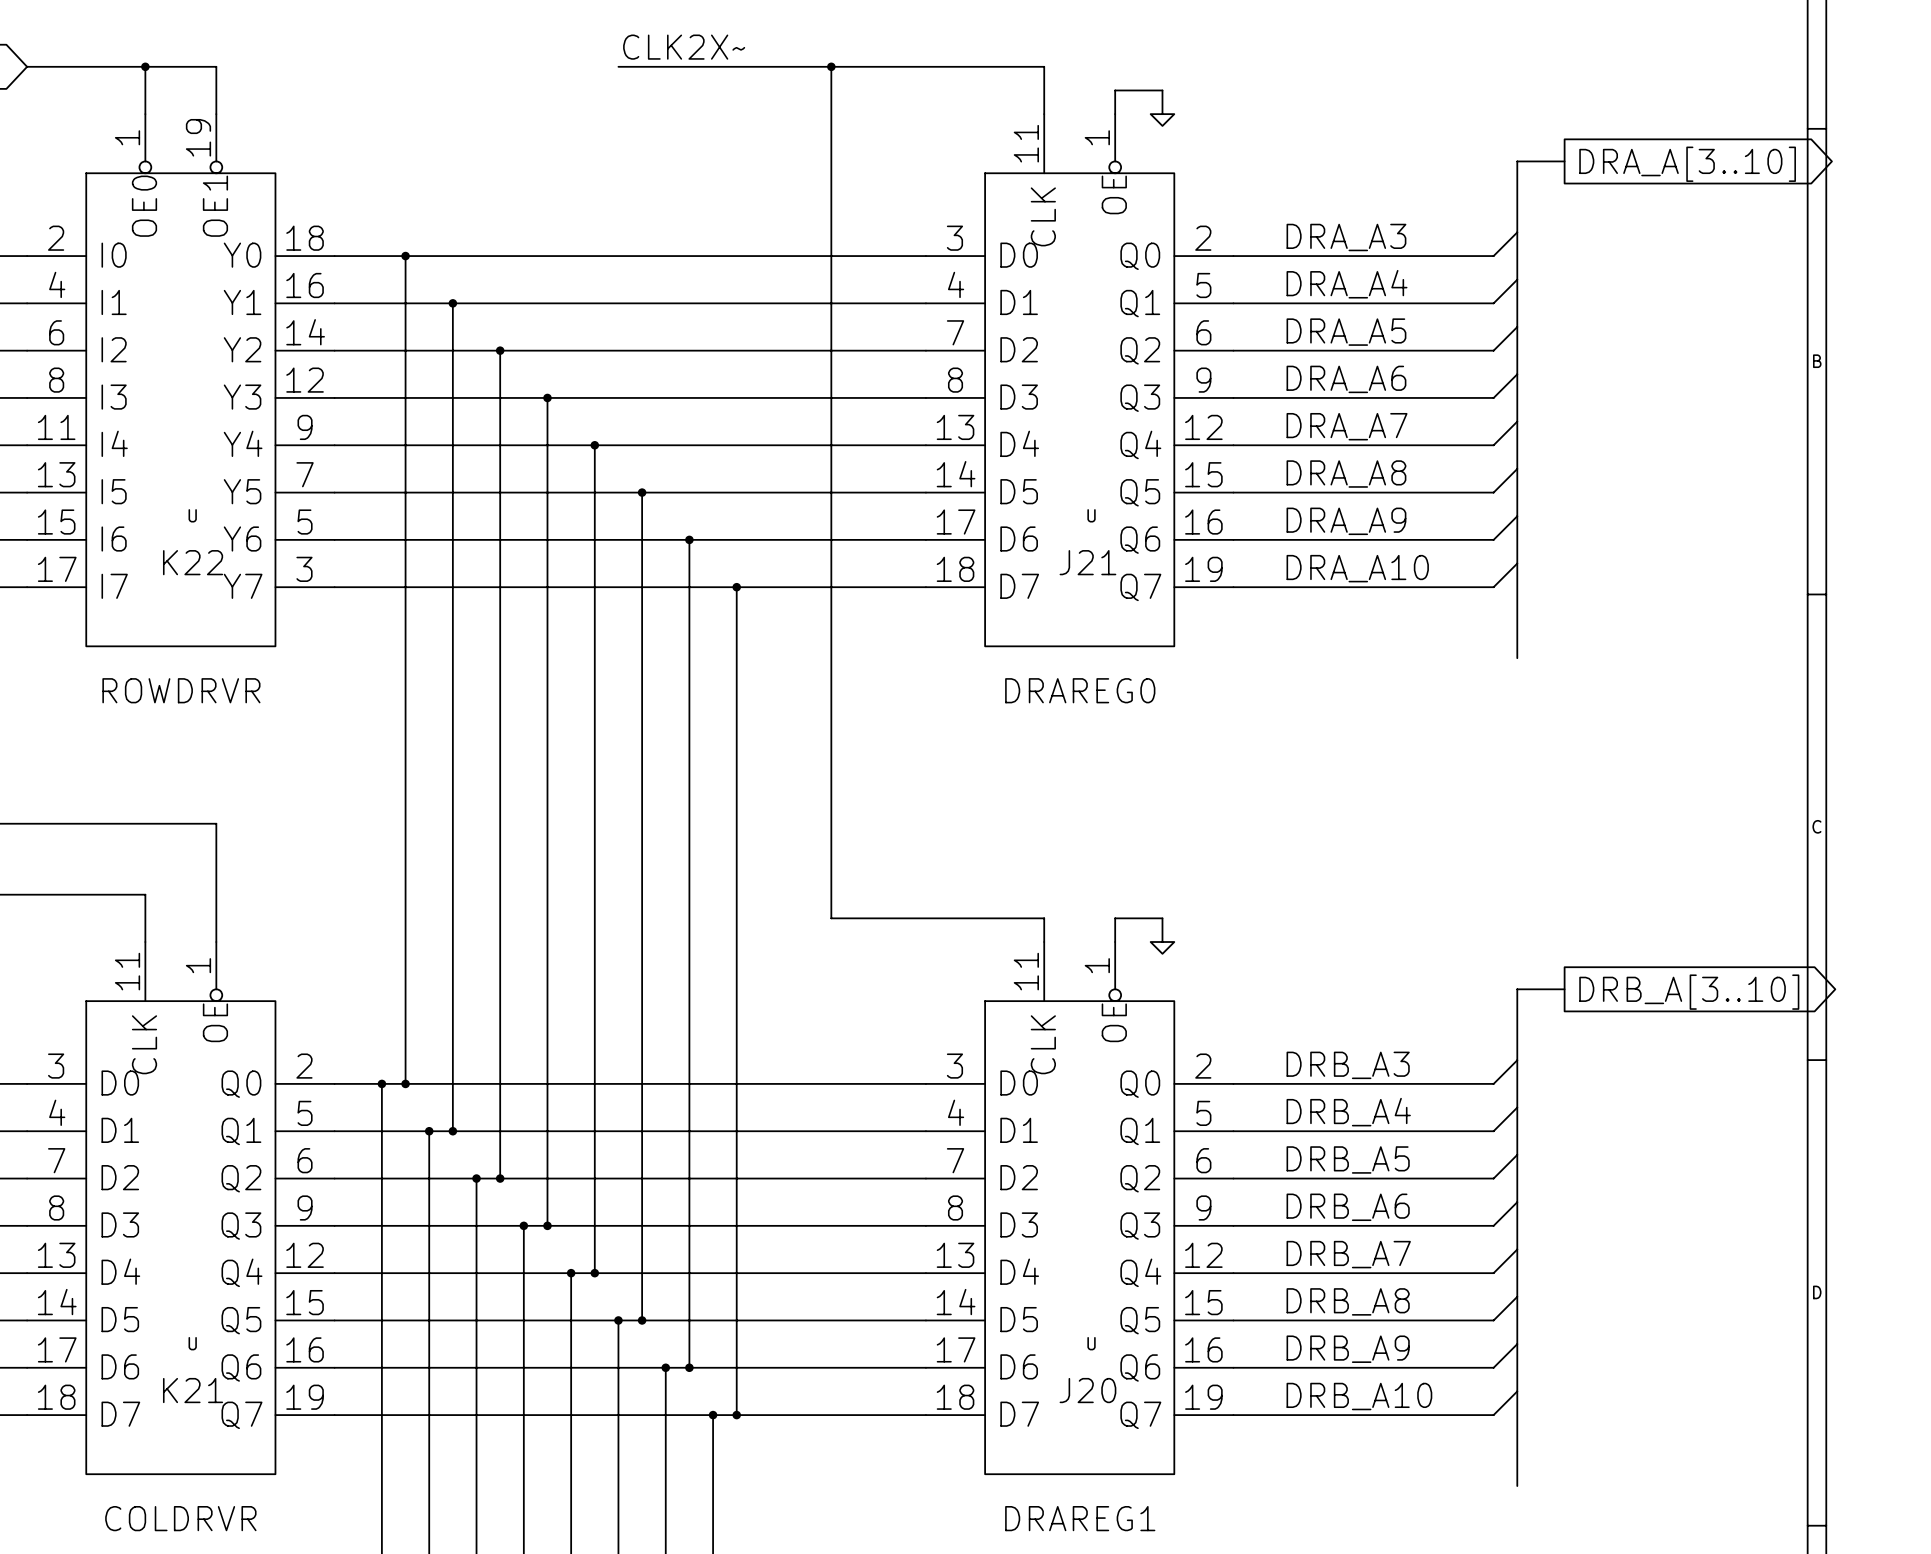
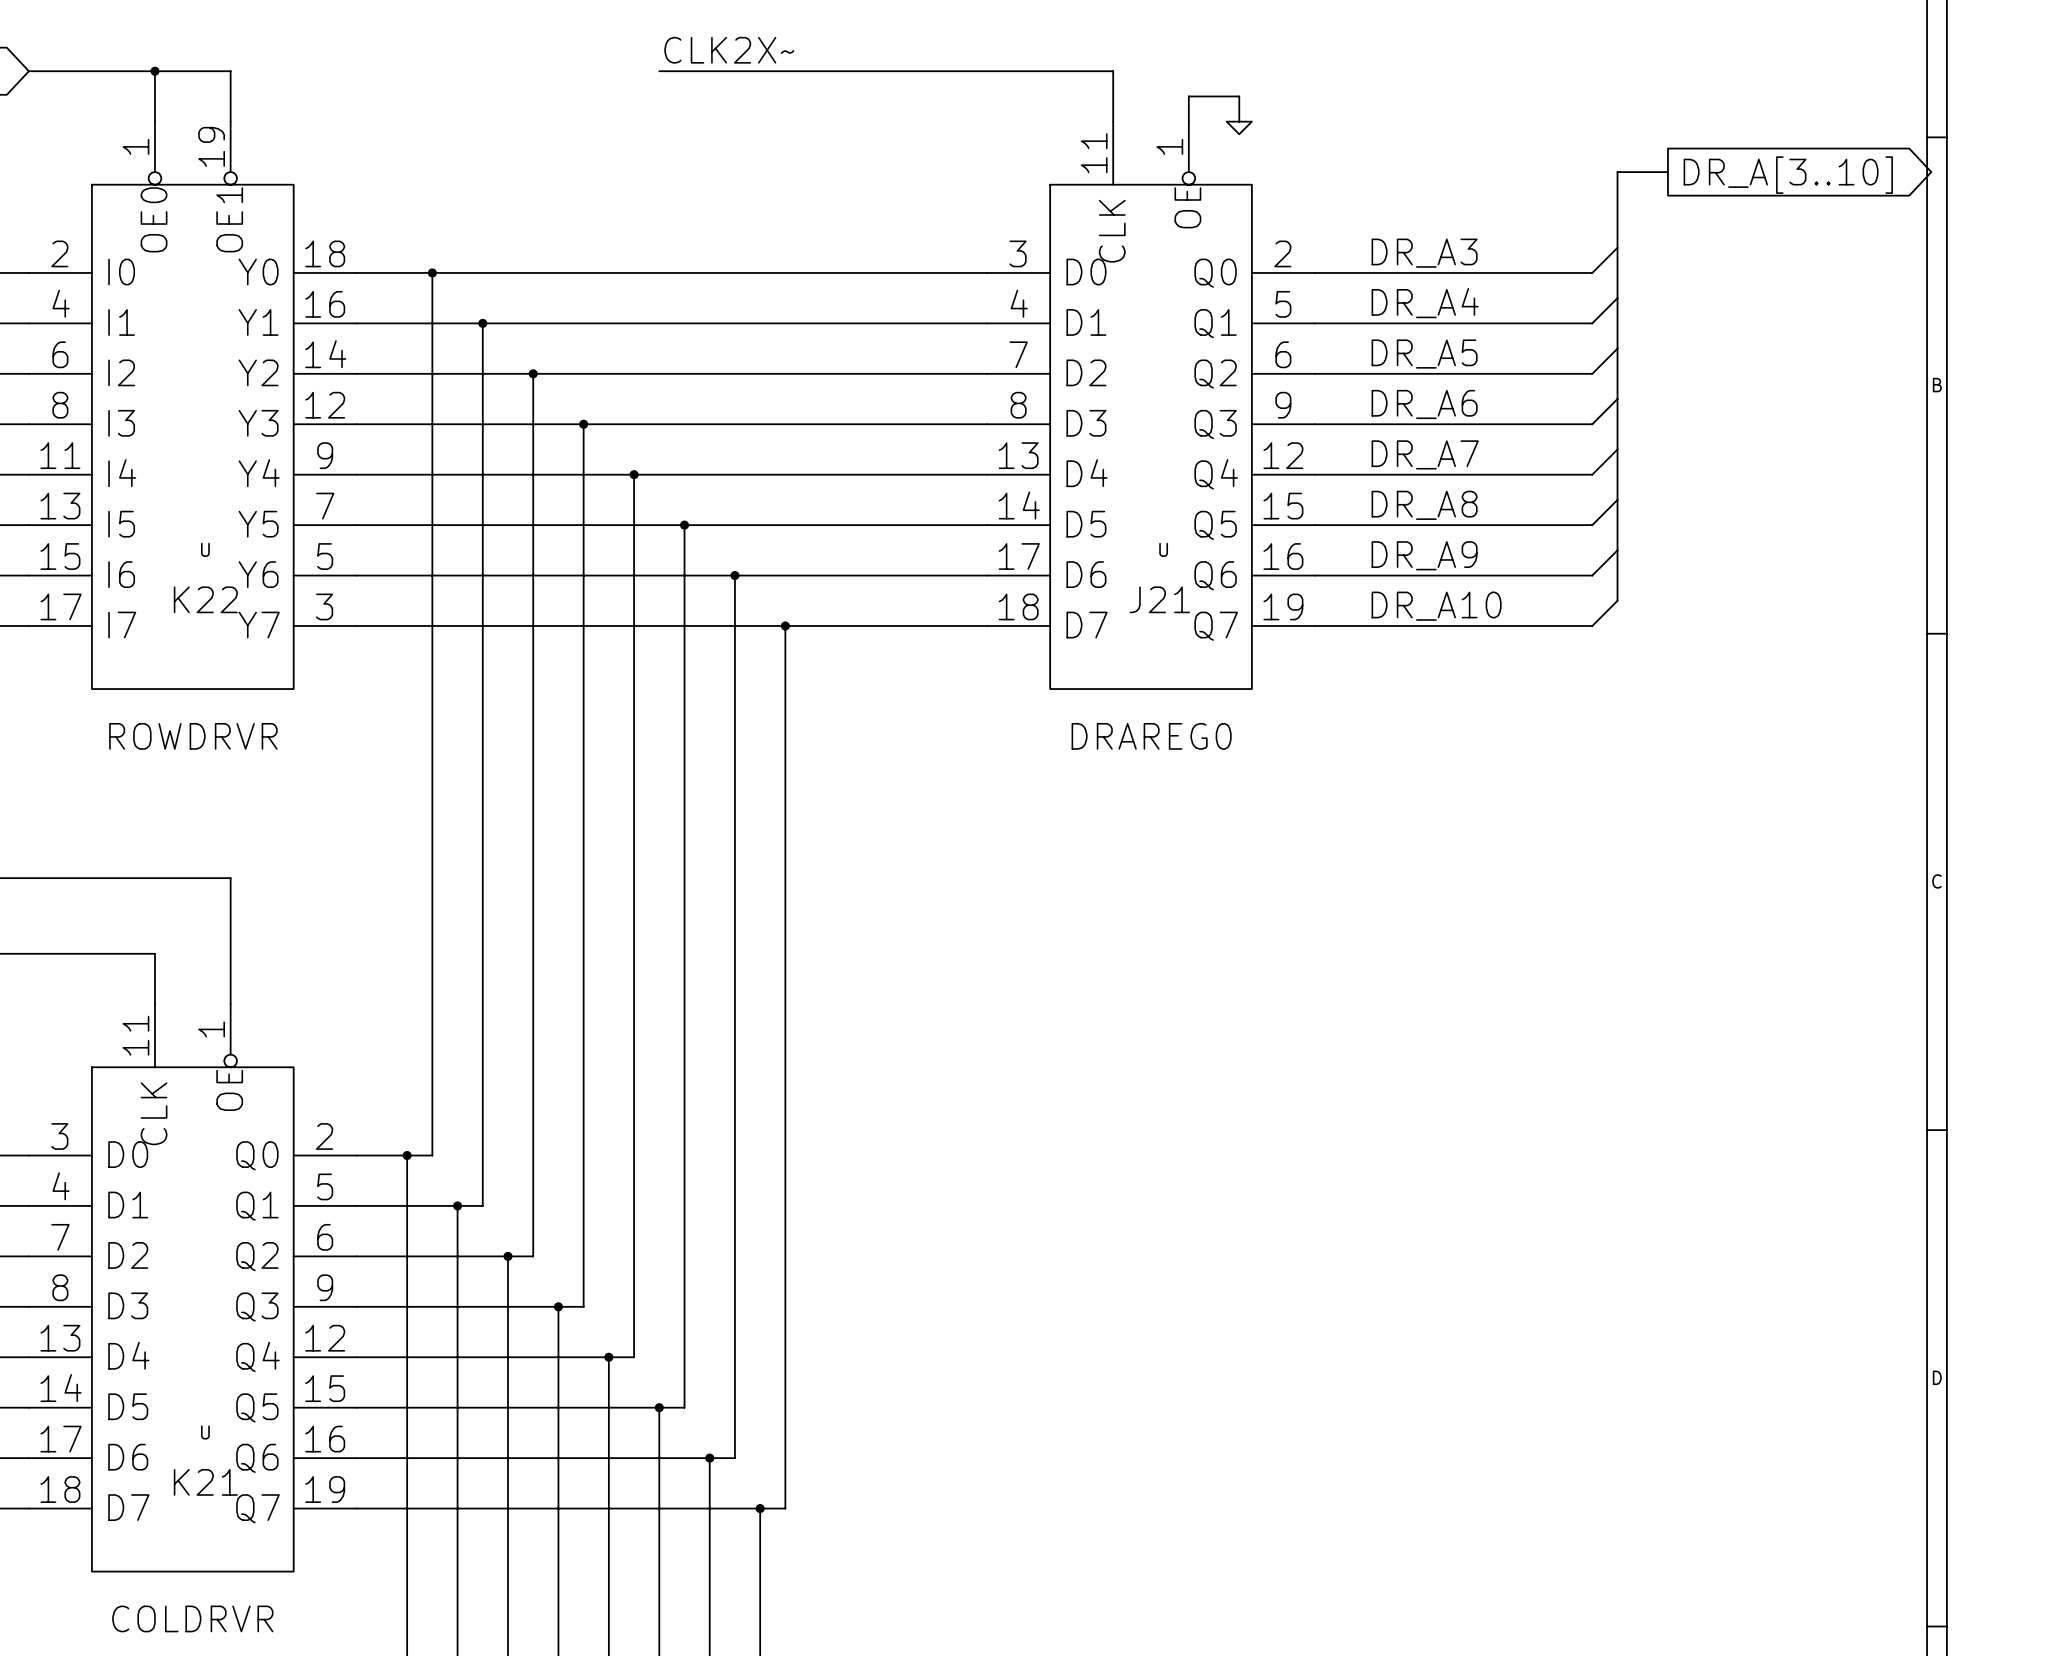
wire: (831, 66) (831, 918) (1044, 918) (1044, 942) -> none
junction: (831, 66) -> none
global label: DRA_A[3..10] (1687, 164) -> DR_A[3..10] (1788, 175)
label: DRA_A3 (1346, 237) -> DR_A3 (1424, 253)
label: DRA_A4 (1347, 284) -> DR_A4 (1425, 303)
label: DRA_A5 (1346, 332) -> DR_A5 (1424, 354)
label: DRA_A6 (1346, 379) -> DR_A6 (1424, 404)
label: DRA_A7 (1347, 426) -> DR_A7 (1425, 454)
label: DRA_A8 (1346, 474) -> DR_A8 (1424, 505)
label: DRA_A9 (1346, 521) -> DR_A9 (1424, 555)
bus: (1517, 563) (1517, 658) -> none
label: DRA_A10 (1357, 568) -> DR_A10 (1436, 606)
wire: (1162, 918) (1115, 918) (1115, 942) -> none
power symbol: (1162, 936) -> none
bus: (1564, 989) (1517, 989) (1517, 1486) -> none
global label: DRB_A[3..10] (1689, 992) -> none
wire: (1517, 1060) (1493, 1083) (1233, 1083) -> none
label: DRB_A3 (1348, 1065) -> none
wire: (405, 1083) (925, 1083) -> none
junction: (405, 1083) -> none
wire: (1517, 1107) (1493, 1131) (1233, 1131) -> none
label: DRB_A4 (1348, 1112) -> none
wire: (452, 1131) (925, 1131) -> none
junction: (452, 1131) -> none
wire: (1517, 1154) (1493, 1178) (1233, 1178) -> none
label: DRB_A5 (1348, 1159) -> none
wire: (500, 1178) (925, 1178) -> none
junction: (500, 1178) -> none
wire: (1517, 1202) (1493, 1225) (1233, 1225) -> none
label: DRB_A6 (1348, 1207) -> none
U: (1079, 1208) -> none
wire: (547, 1225) (925, 1225) -> none
junction: (547, 1225) -> none
wire: (1517, 1249) (1493, 1273) (1233, 1273) -> none
label: DRB_A7 (1348, 1254) -> none
wire: (594, 1273) (925, 1273) -> none
junction: (594, 1273) -> none
wire: (1517, 1296) (1493, 1320) (1233, 1320) -> none
label: DRB_A8 (1348, 1301) -> none
wire: (642, 1320) (925, 1320) -> none
junction: (642, 1320) -> none
wire: (1517, 1344) (1493, 1367) (1233, 1367) -> none
label: DRB_A9 (1348, 1349) -> none
wire: (689, 1367) (925, 1367) -> none
junction: (689, 1367) -> none
wire: (1517, 1391) (1493, 1415) (1233, 1415) -> none
label: DRB_A10 (1359, 1396) -> none
wire: (736, 1415) (925, 1415) -> none
junction: (736, 1415) -> none

